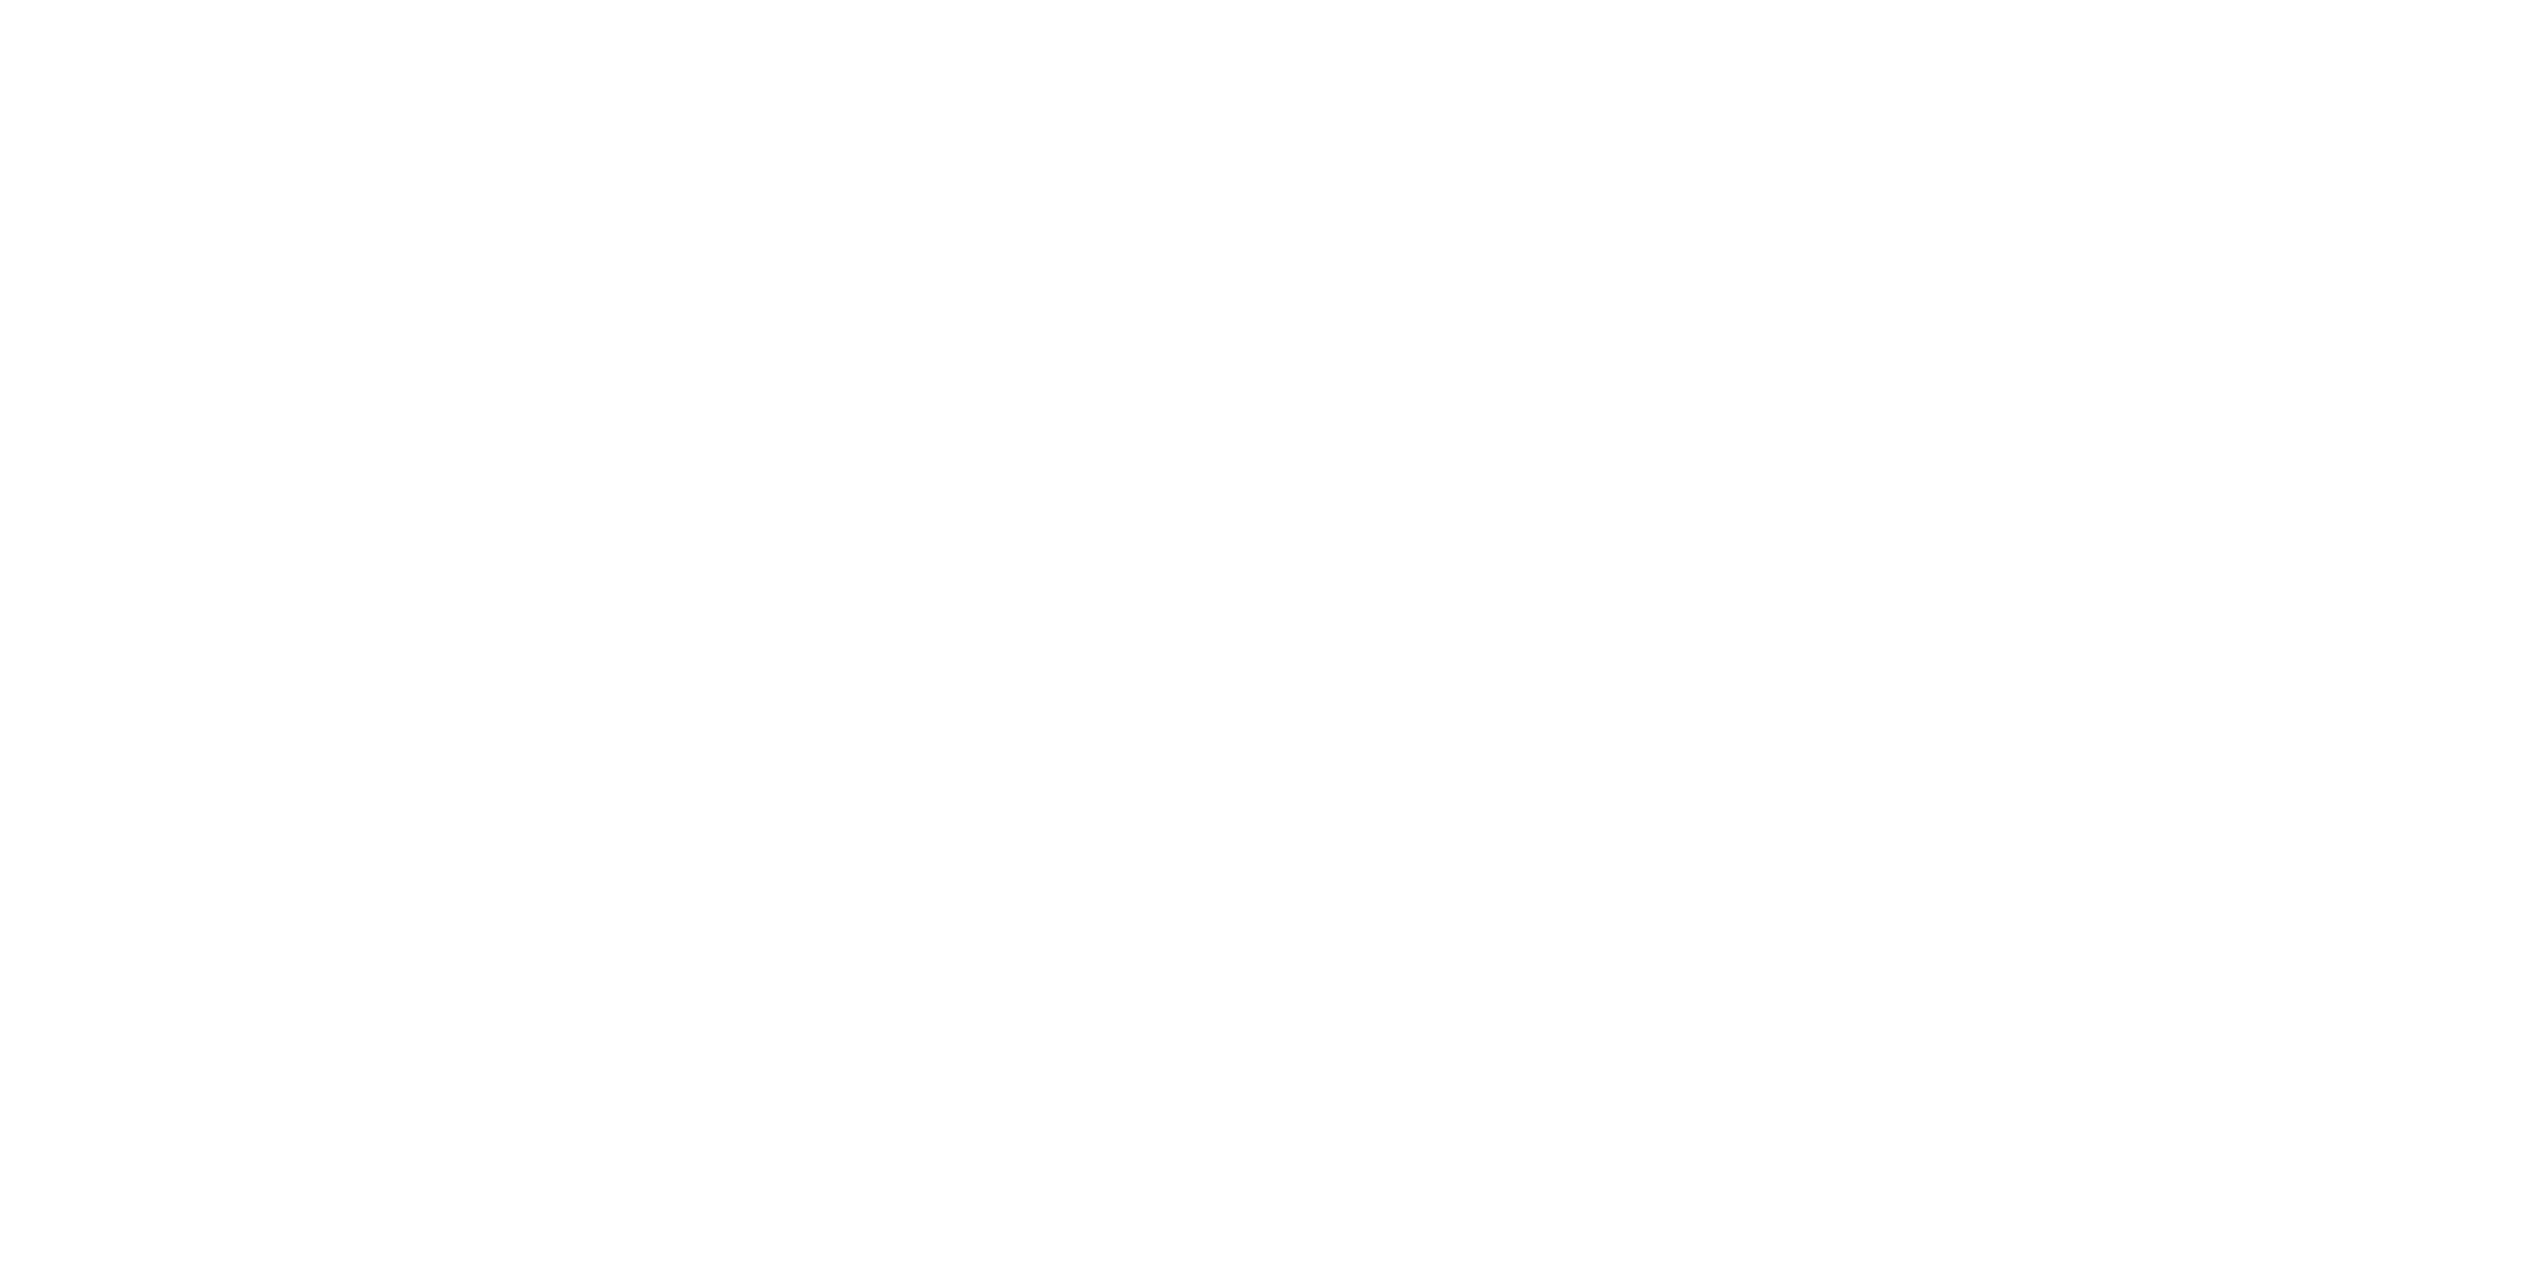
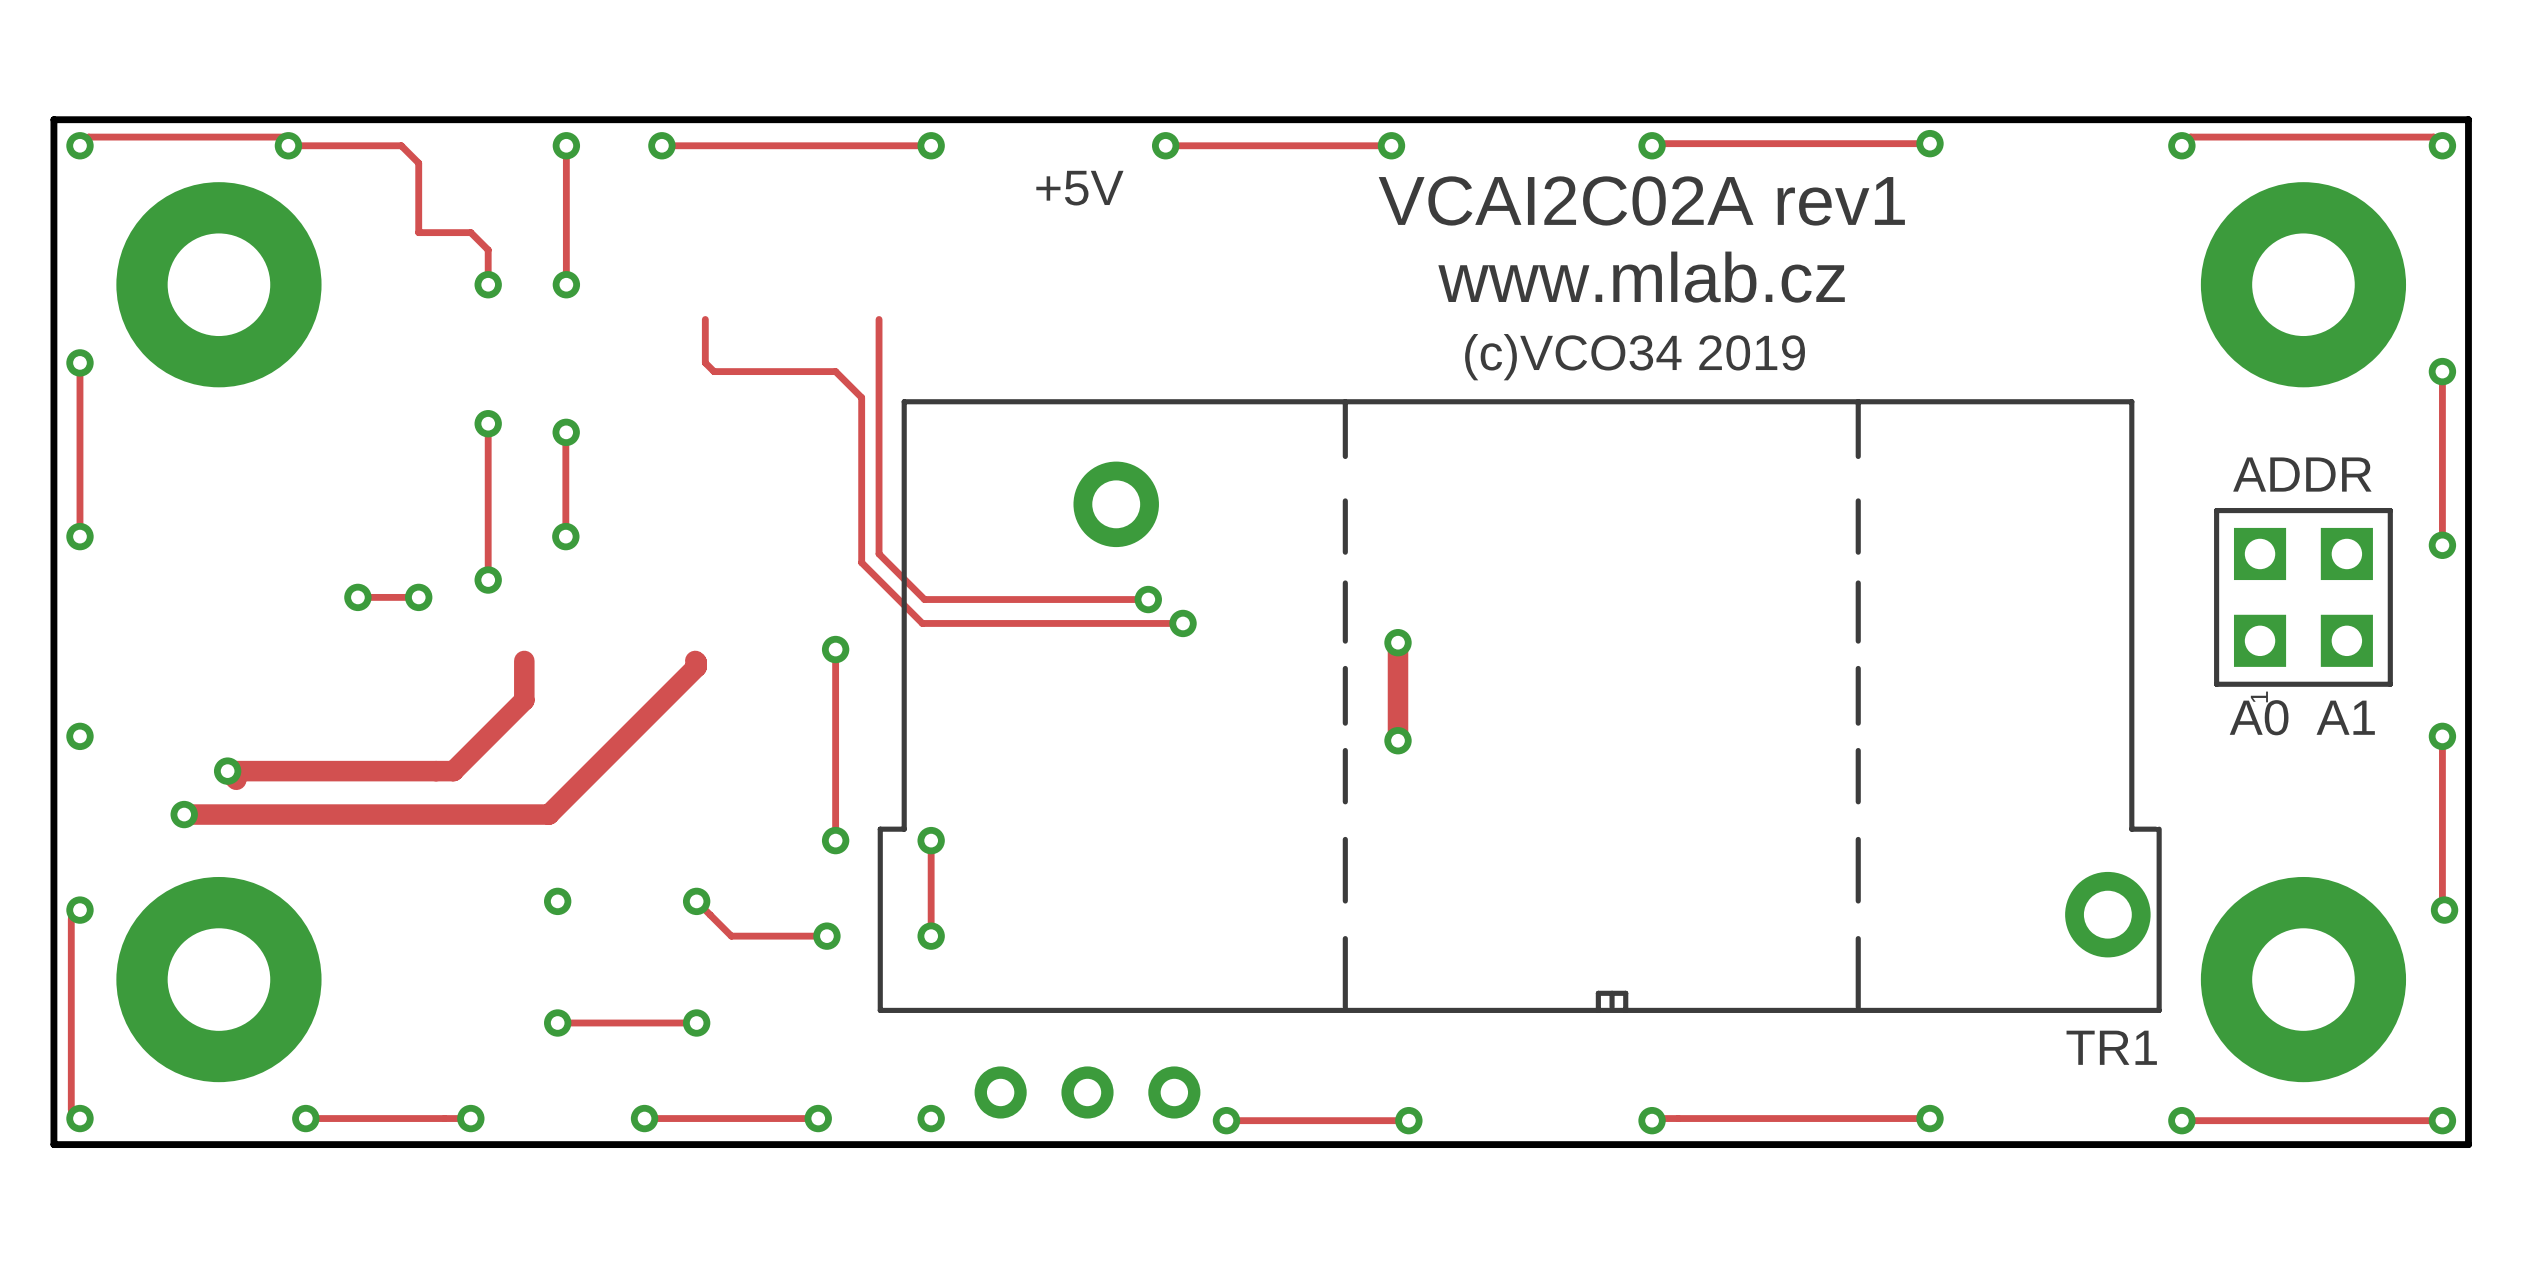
board edge: none -> (53, 119) (2468, 119) (2468, 1144) (53, 1144) (53, 119)
track: none -> (1929, 143) (1654, 143) (1652, 145)
via: none -> (1929, 143)
track: none -> (79, 145) (88, 137) (288, 137) (297, 145)
via: none -> (79, 145)
track: none -> (288, 145) (401, 145) (418, 163) (418, 232) (470, 232) (488, 249) (488, 284)
via: none -> (288, 145)
track: none -> (566, 145) (566, 284)
via: none -> (566, 145)
track: none -> (661, 145) (922, 145)
via: none -> (661, 145)
via: none -> (931, 145)
track: none -> (1165, 145) (1391, 145)
via: none -> (1165, 145)
via: none -> (1391, 145)
via: none -> (1652, 145)
track: none -> (2181, 145) (2190, 137) (2433, 137) (2442, 145)
via: none -> (2181, 145)
via: none -> (2442, 145)
text: none -> +5V (1079, 188)
text: none -> VCAI2C02A rev1 (1641, 200)
text: none -> www.mlab.cz (1641, 277)
part: none -> (218, 284)
via: none -> (488, 284)
via: none -> (566, 284)
part: none -> (2303, 284)
track: none -> (705, 319) (705, 362) (714, 371) (835, 371) (861, 397) (861, 562) (922, 623) (1183, 623)
track: none -> (879, 319) (879, 553) (924, 599) (1146, 599) (1148, 597)
text: none -> (c)VCO34 2019 (1635, 357)
track: none -> (79, 362) (79, 545)
via: none -> (79, 362)
track: none -> (2442, 371) (2442, 545)
via: none -> (2442, 371)
track: none -> (488, 423) (488, 580)
via: none -> (488, 423)
track: none -> (565, 432) (565, 536)
via: none -> (566, 432)
via: none -> (79, 536)
via: none -> (565, 536)
via: none -> (2442, 545)
via: none -> (488, 580)
track: none -> (357, 597) (418, 597)
via: none -> (357, 597)
via: none -> (418, 597)
part: none -> ADDR (2303, 597)
via: none -> (1148, 599)
via: none -> (1183, 623)
track: none -> (1398, 642) (1398, 740)
via: none -> (1398, 642)
track: none -> (835, 649) (835, 840)
via: none -> (835, 649)
track: none -> (524, 660) (524, 700) (453, 771) (227, 771) (236, 779)
track: none -> (695, 660) (696, 666) (548, 814) (184, 814)
text: none -> A0 (2259, 717)
text: none -> A1 (2345, 717)
via: none -> (79, 736)
track: none -> (2442, 736) (2442, 907) (2444, 910)
via: none -> (2442, 736)
via: none -> (1398, 740)
TR1: none -> (1519, 758)
via: none -> (227, 771)
via: none -> (184, 814)
via: none -> (835, 840)
track: none -> (931, 840) (931, 944)
via: none -> (931, 840)
via: none -> (557, 901)
track: none -> (696, 901) (731, 936) (818, 936) (826, 944)
via: none -> (696, 901)
track: none -> (79, 910) (71, 918) (71, 1109) (79, 1118)
via: none -> (79, 910)
via: none -> (2444, 910)
via: none -> (826, 936)
via: none -> (931, 936)
part: none -> (218, 979)
part: none -> (2303, 979)
track: none -> (557, 1023) (696, 1023)
via: none -> (557, 1023)
via: none -> (696, 1023)
via: none -> (79, 1118)
track: none -> (305, 1118) (470, 1118)
via: none -> (305, 1118)
via: none -> (470, 1118)
track: none -> (644, 1118) (818, 1118)
via: none -> (644, 1118)
via: none -> (818, 1118)
via: none -> (931, 1118)
track: none -> (1929, 1118) (1654, 1118) (1652, 1120)
via: none -> (1929, 1118)
track: none -> (1226, 1120) (1408, 1120)
via: none -> (1226, 1120)
via: none -> (1408, 1120)
via: none -> (1652, 1120)
track: none -> (2181, 1120) (2442, 1120)
via: none -> (2181, 1120)
via: none -> (2442, 1120)

